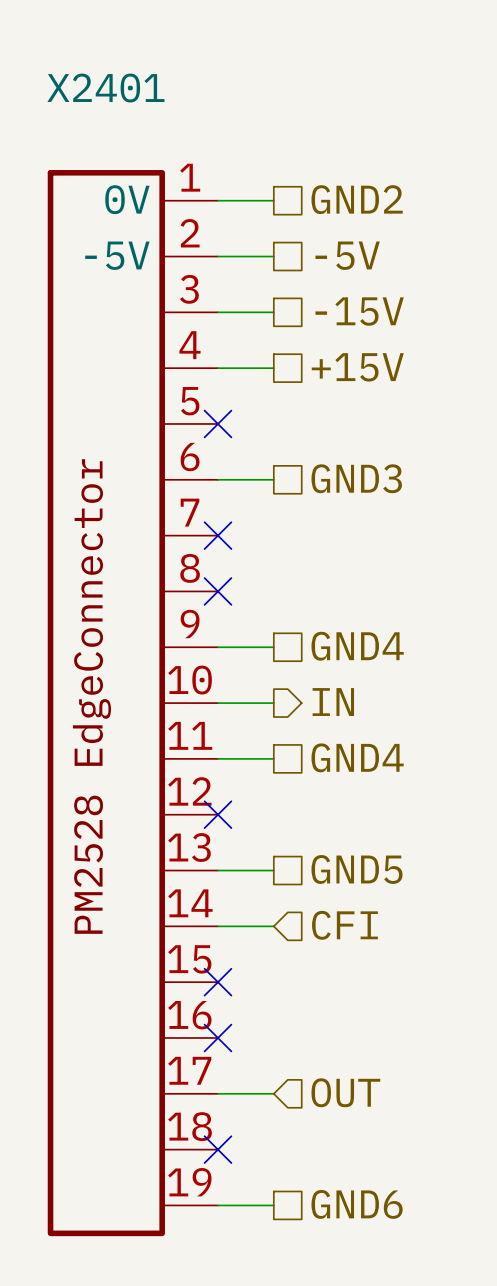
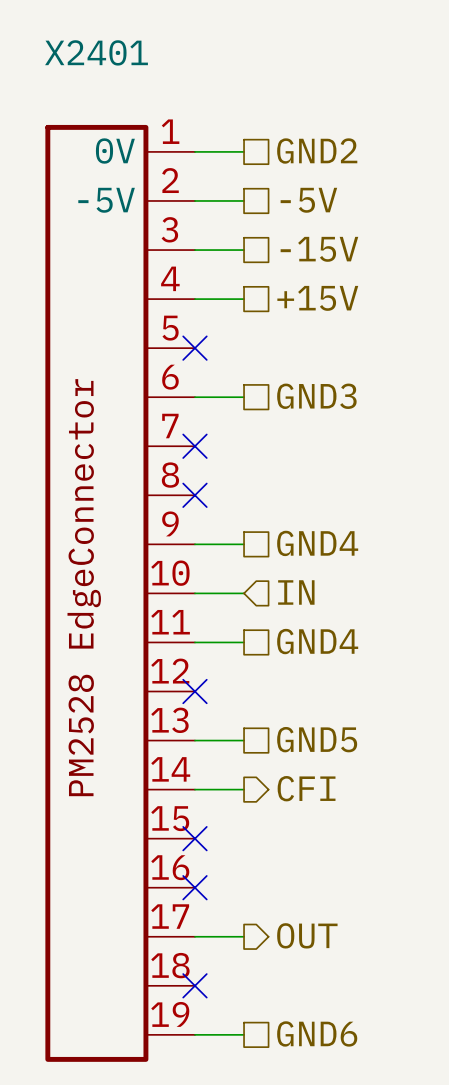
hierarchical label shape: output (333, 702) -> input (296, 592)
hierarchical label shape: input (344, 925) -> output (306, 788)
hierarchical label shape: input (345, 1092) -> output (307, 935)

